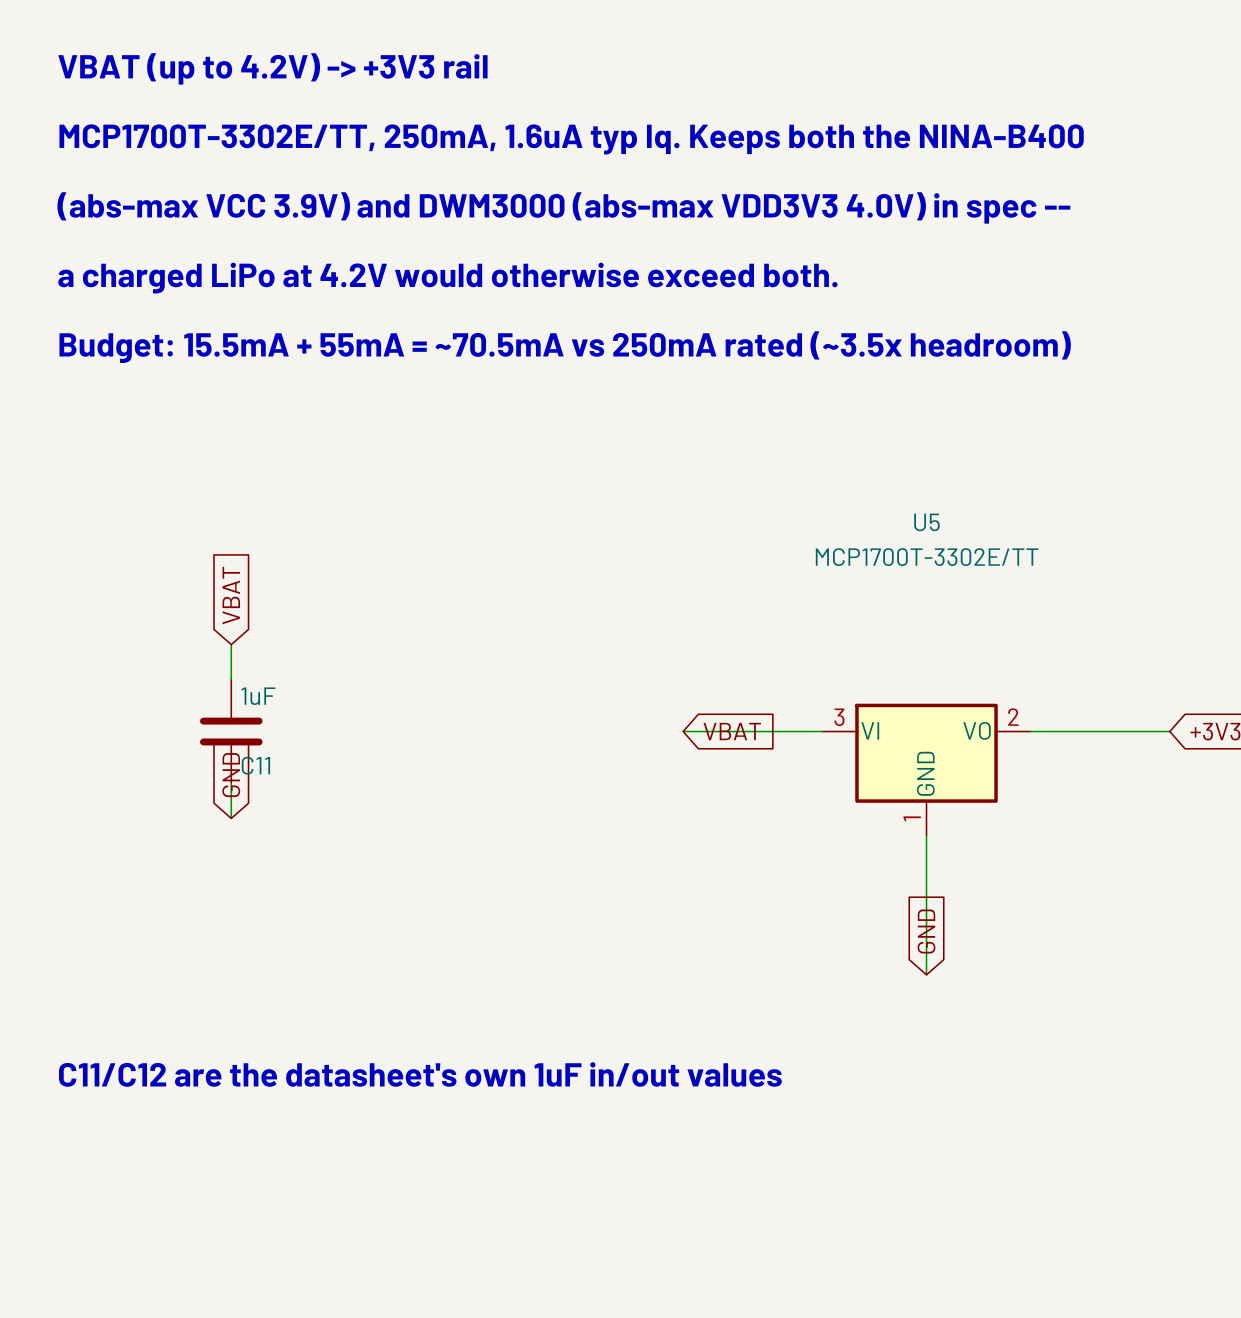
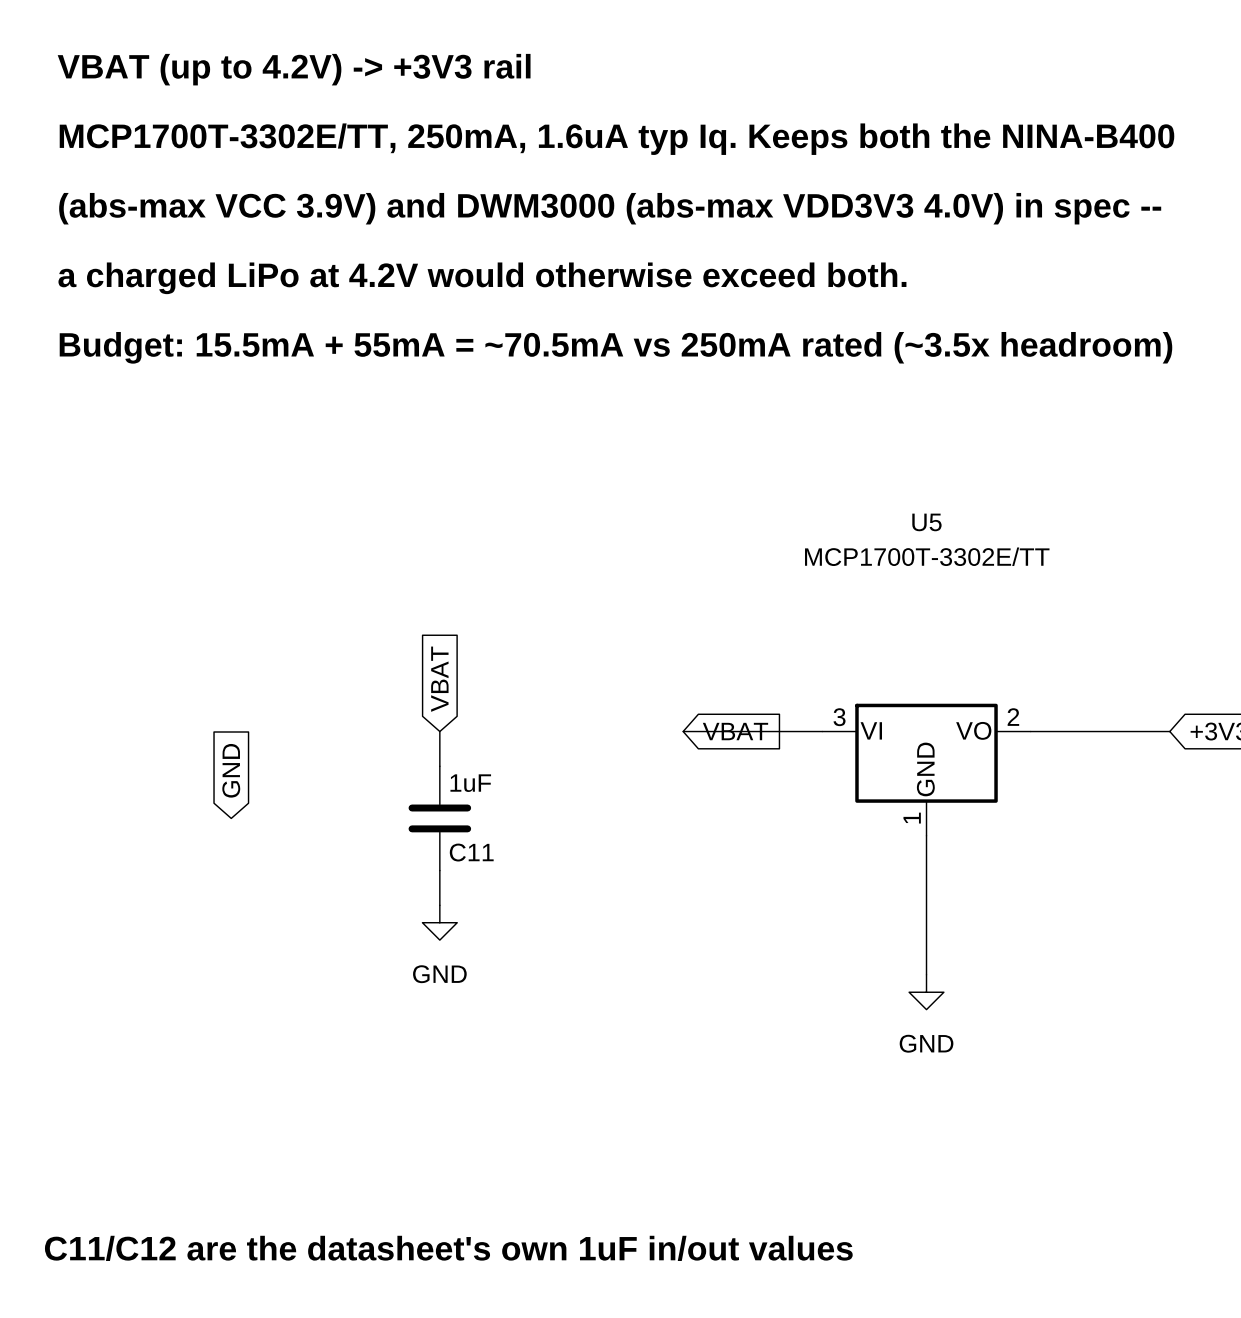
global label position: VBAT (231, 595) -> VBAT (439, 679)
wire: (231, 644) (231, 679) -> (439, 731) (439, 766)
C11 position: (231, 731) -> (439, 818)
wire: (231, 783) (231, 818) -> (439, 870) (439, 905)
power symbol: none -> GND (439, 922)
global label: GND (926, 931) -> none
power symbol: none -> GND (926, 992)
text position: C11/C12 are the datasheet's own 1uF in/out values (420, 1074) -> C11/C12 are the datasheet's own 1uF in/out values (448, 1248)

